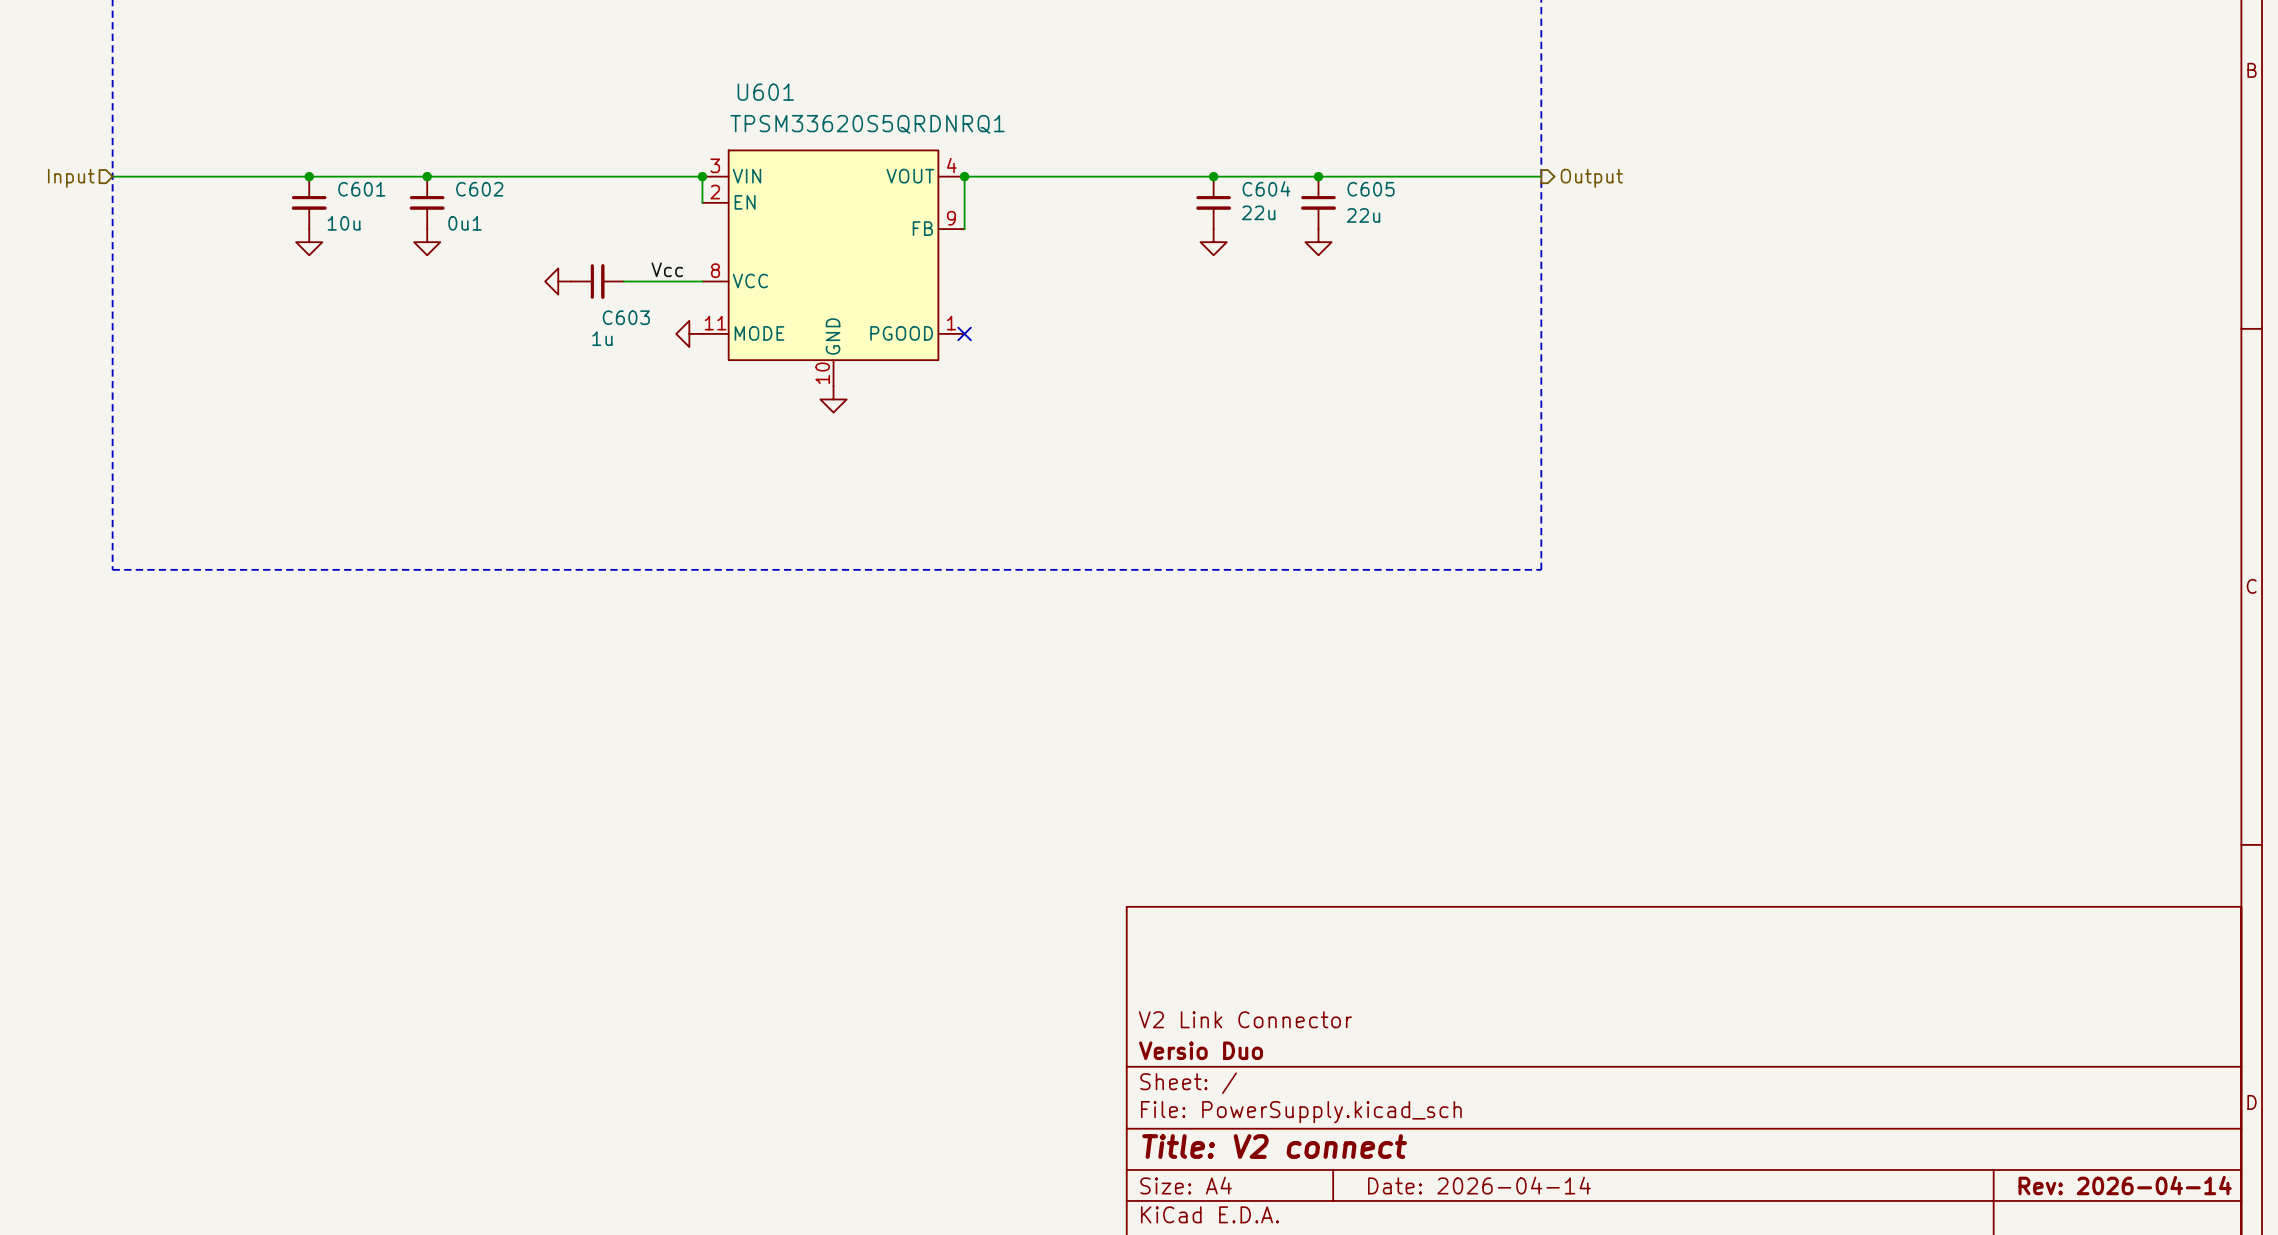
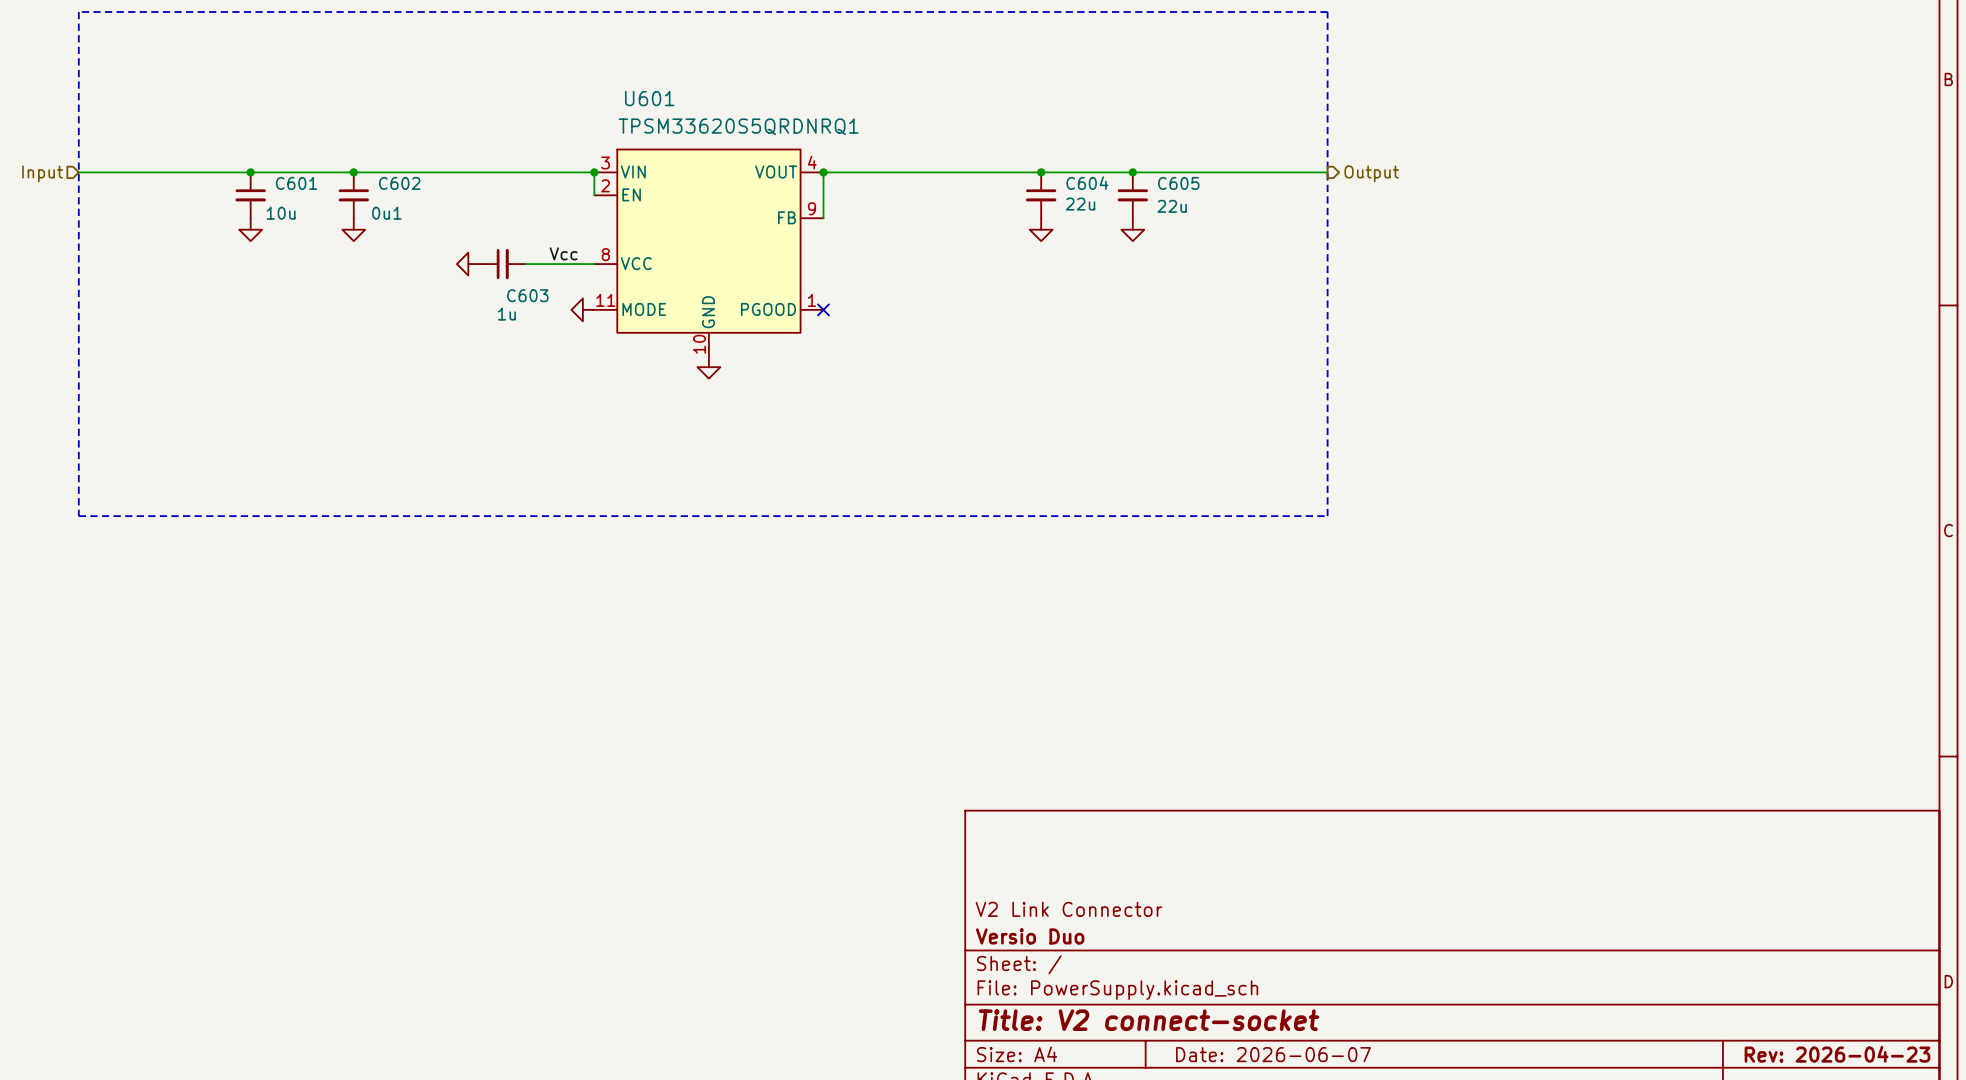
title block: Title: V2 connect (1274, 1146) -> Title: V2 connect-socket (1149, 1020)
title block: Date: 2026-04-14 (1479, 1185) -> Date: 2026-06-07 (1273, 1054)
title block: Rev: 2026-04-14 (2125, 1185) -> Rev: 2026-04-23 (1837, 1054)

